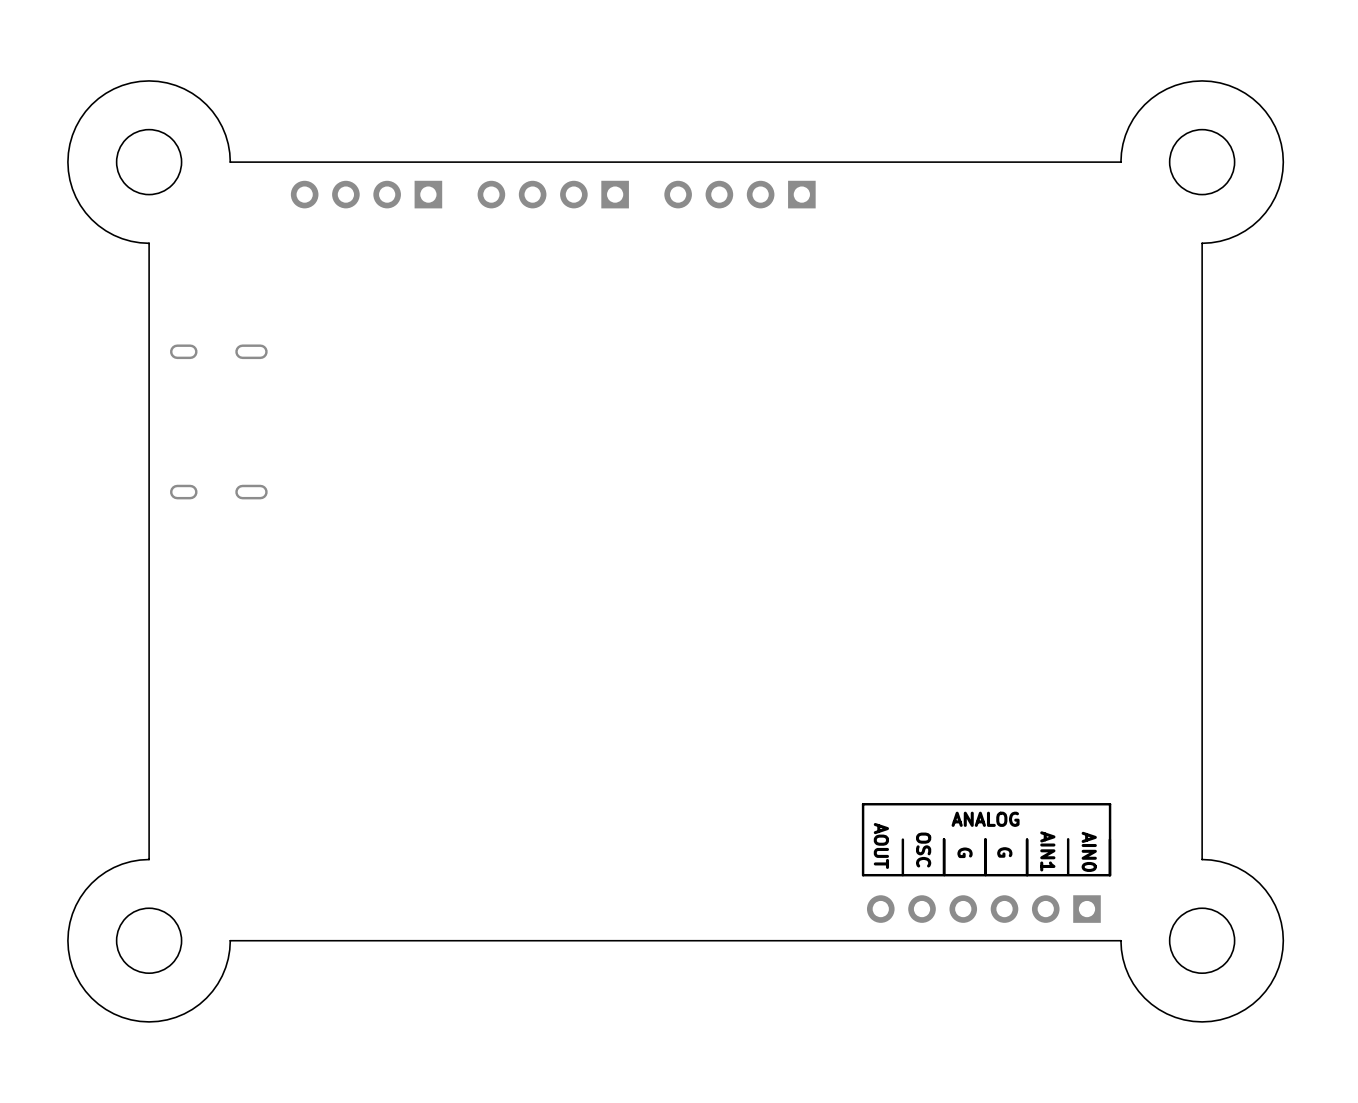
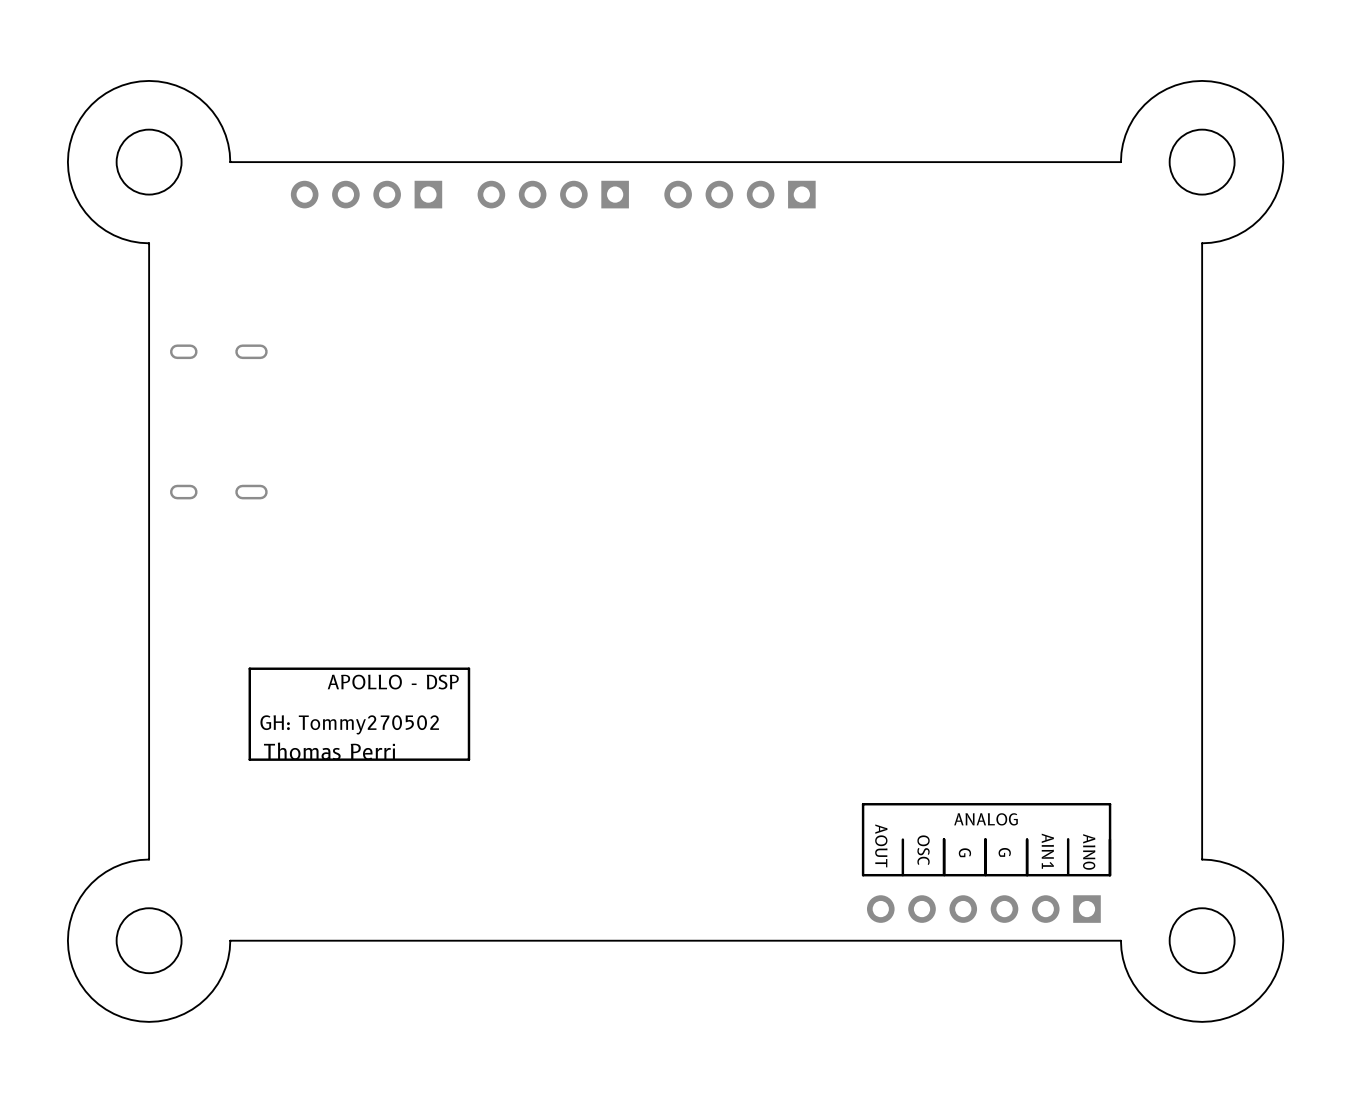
line: none -> (468, 668) (249, 668) (249, 759) (468, 759) (468, 668)
text: none -> APOLLO - DSP (393, 682)
text: none -> GH: Tommy270502 (349, 724)
text: none -> Thomas Perri (329, 751)

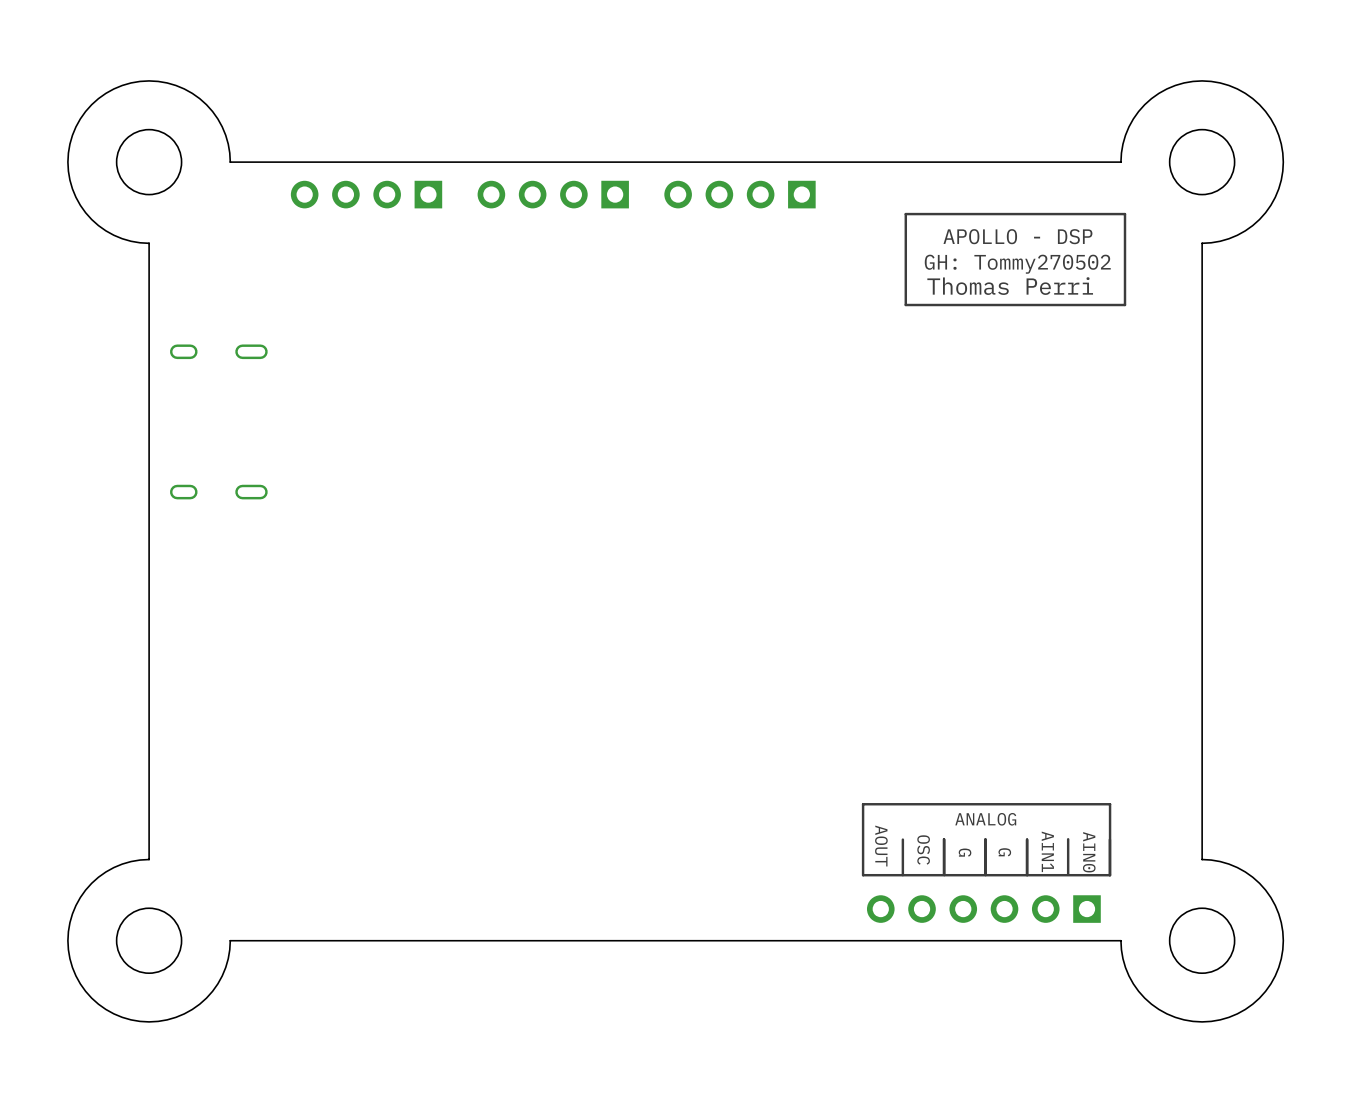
line: none -> (1125, 214) (905, 214) (905, 305) (1125, 305) (1125, 214)
text: none -> APOLLO - DSP (1017, 236)
text: none -> GH: Tommy270502 (1017, 264)
text: none -> Thomas Perri (1010, 286)
line: (468, 668) (249, 668) (249, 759) (468, 759) (468, 668) -> none
text: APOLLO - DSP (393, 682) -> none
text: GH: Tommy270502 (349, 724) -> none
text: Thomas Perri (329, 751) -> none

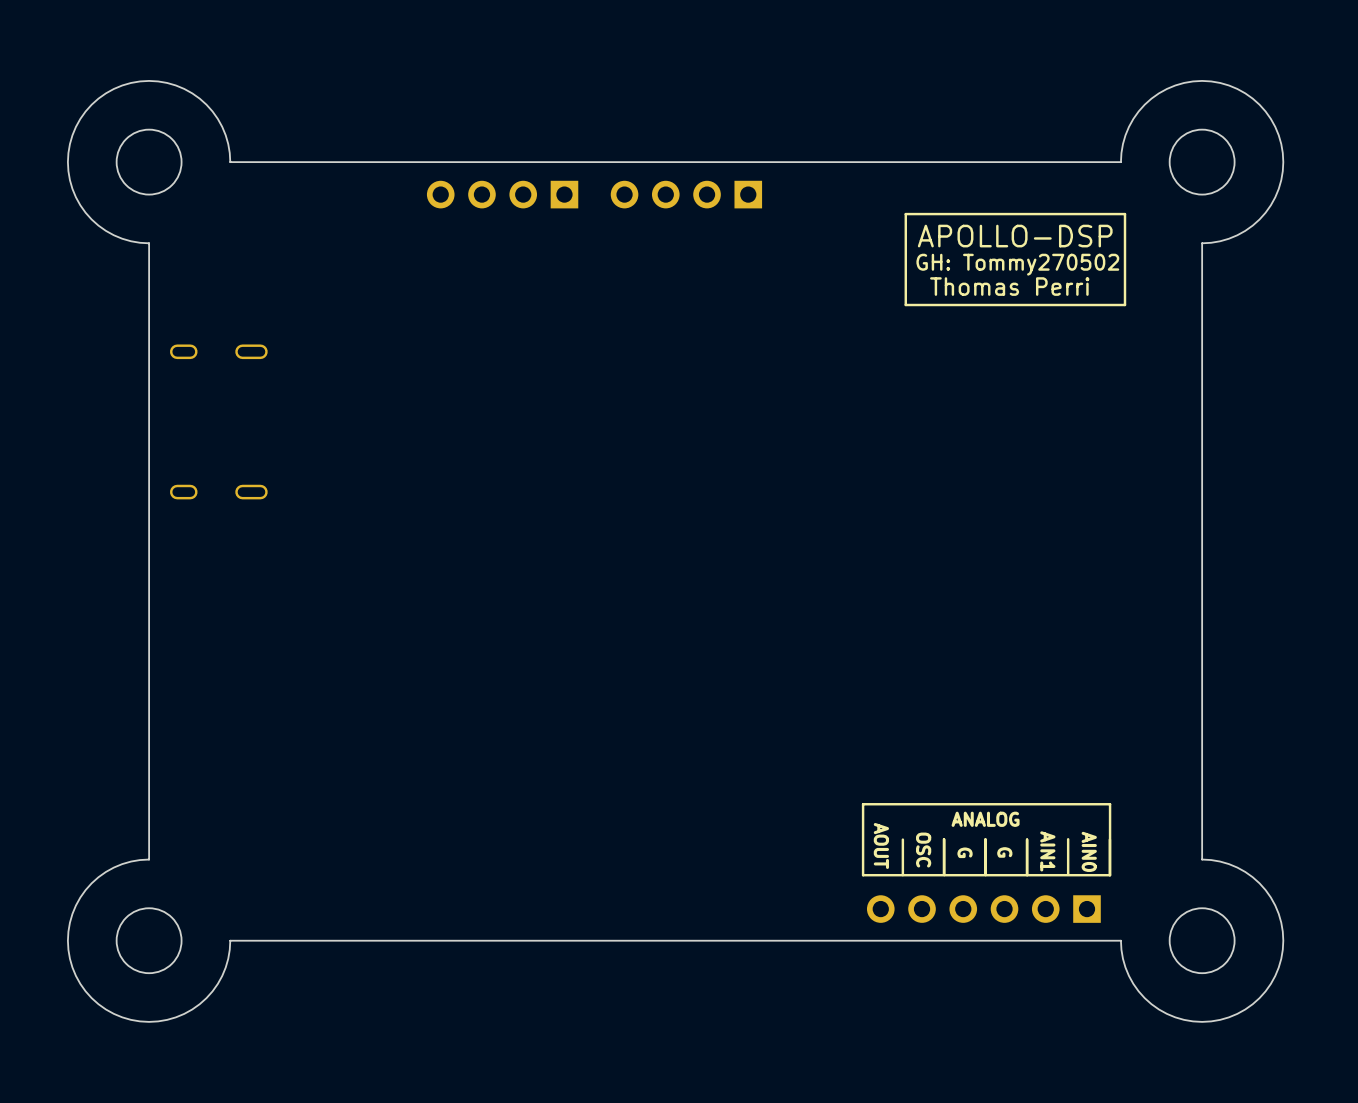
part: (366, 194) -> none
part position: (553, 194) -> (502, 194)
part position: (740, 194) -> (686, 194)
text: APOLLO - DSP (1017, 236) -> APOLLO-DSP (1015, 236)

